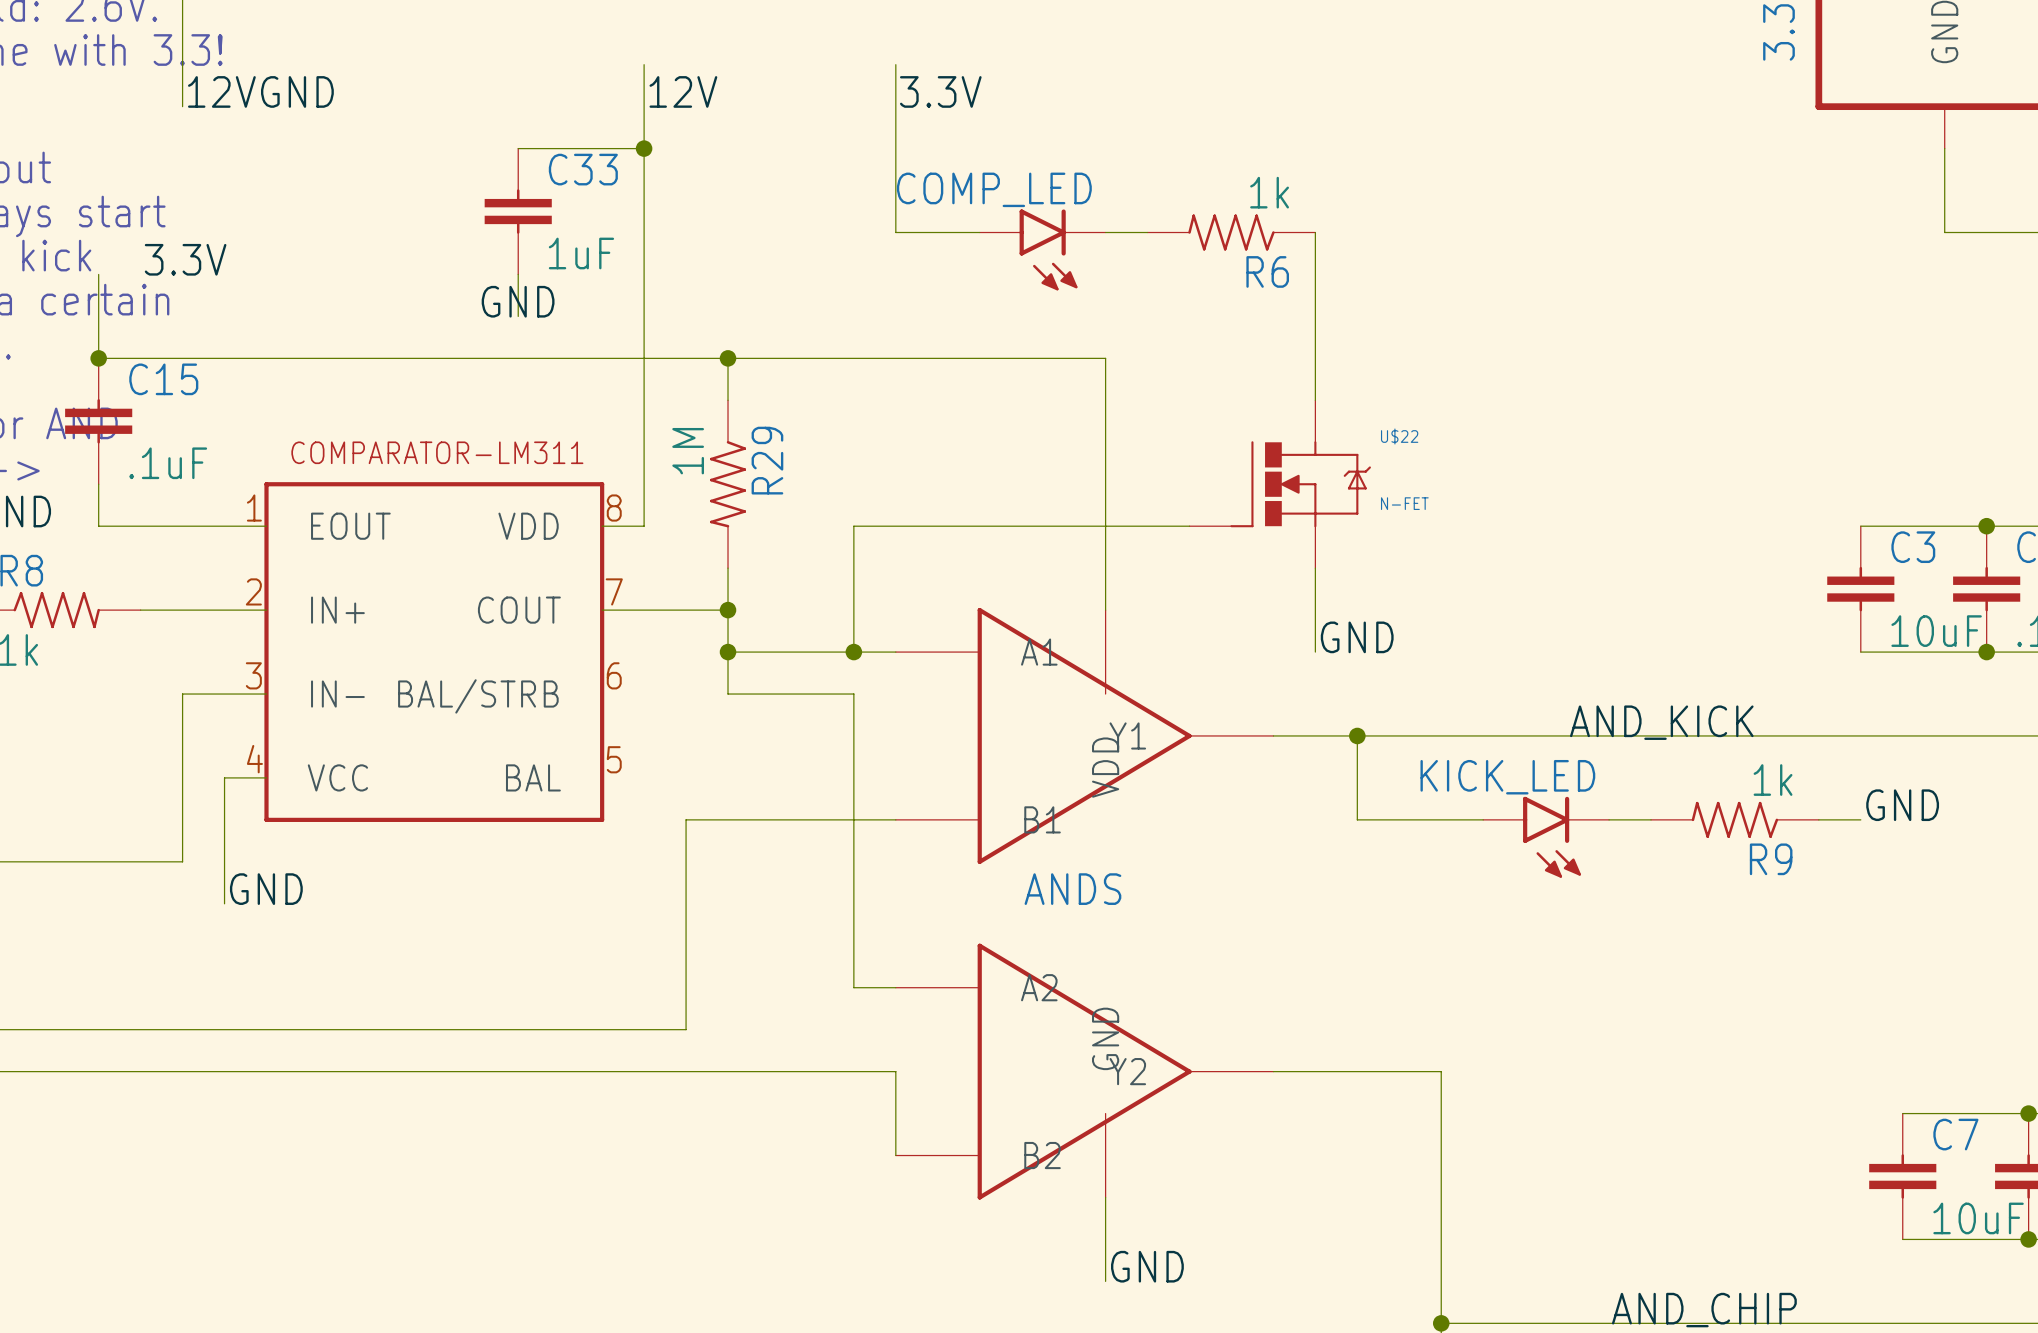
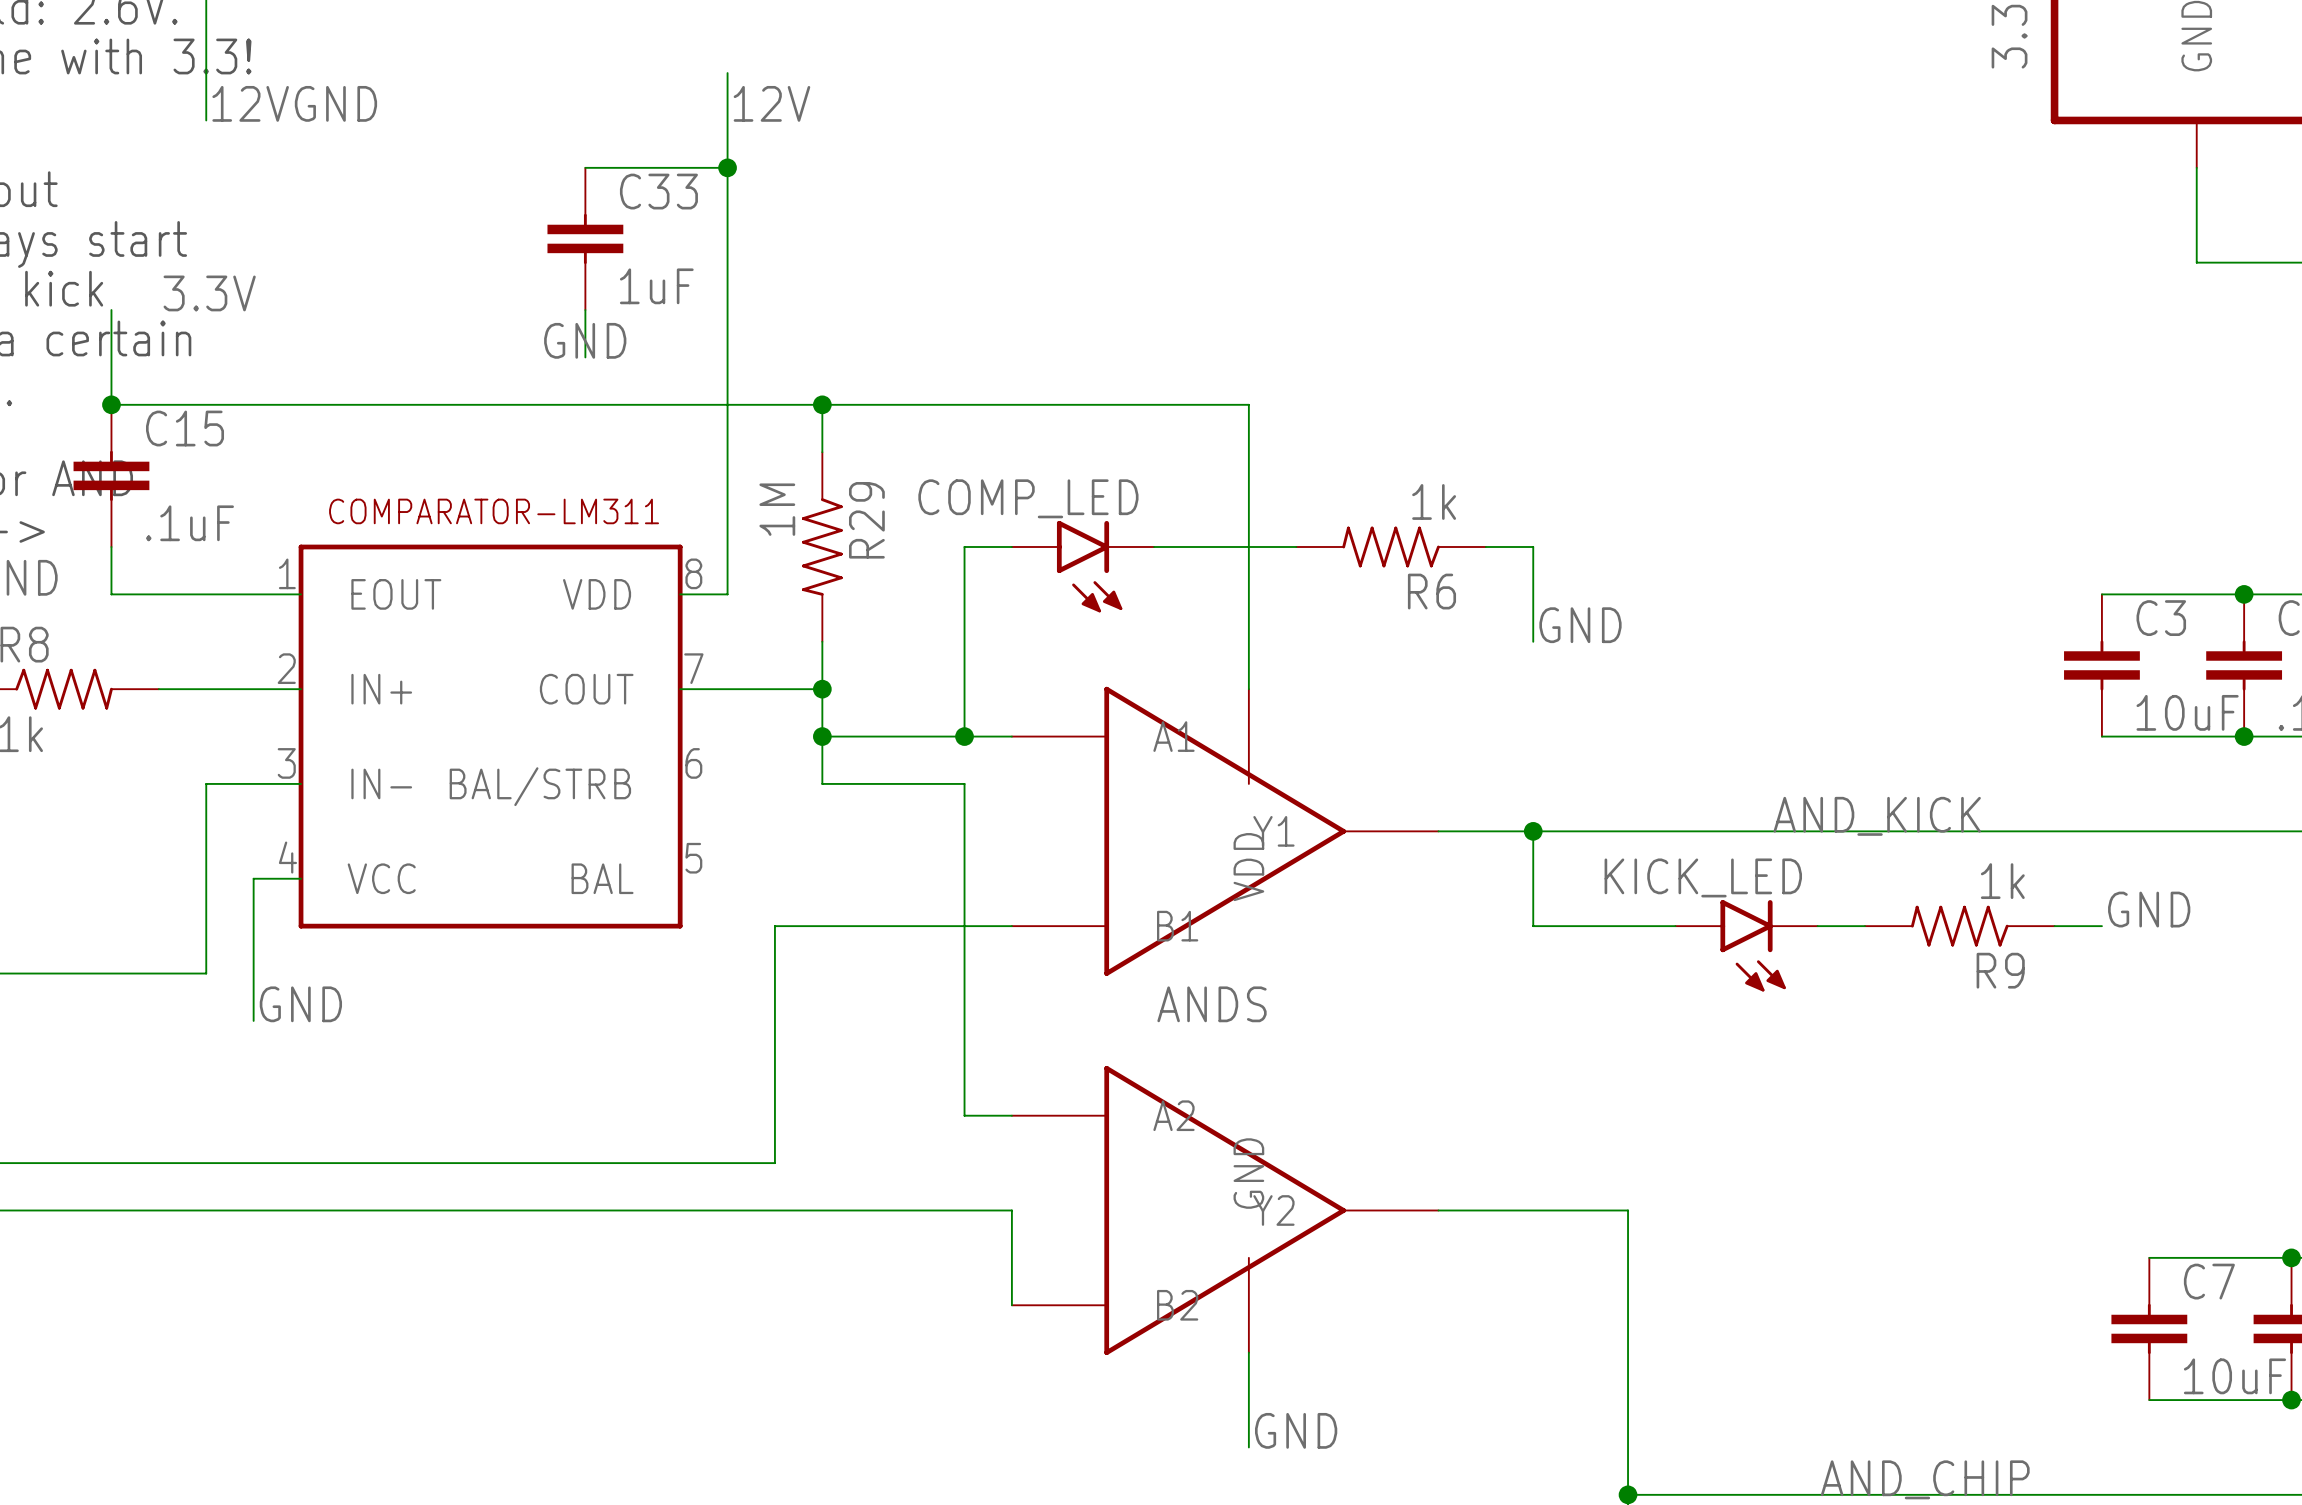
wire: (895, 64) (895, 232) (979, 232) -> none
label: 3.3V (940, 91) -> none
wire: (1105, 232) (1147, 232) -> none
R6 position: (1231, 232) -> (1391, 546)
wire: (1315, 232) (1315, 400) -> none
COMP_LED position: (1042, 249) -> (1083, 566)
wire: none -> (1154, 546) (1296, 546)
U$22: N-FET (1280, 484) -> none
wire: none -> (1485, 546) (1533, 546) (1533, 641)
wire: (853, 526) (1189, 526) -> (964, 594) (964, 546) (1011, 546)
wire: (1315, 568) (1315, 652) -> none
label position: GND (1357, 637) -> GND (1580, 625)

